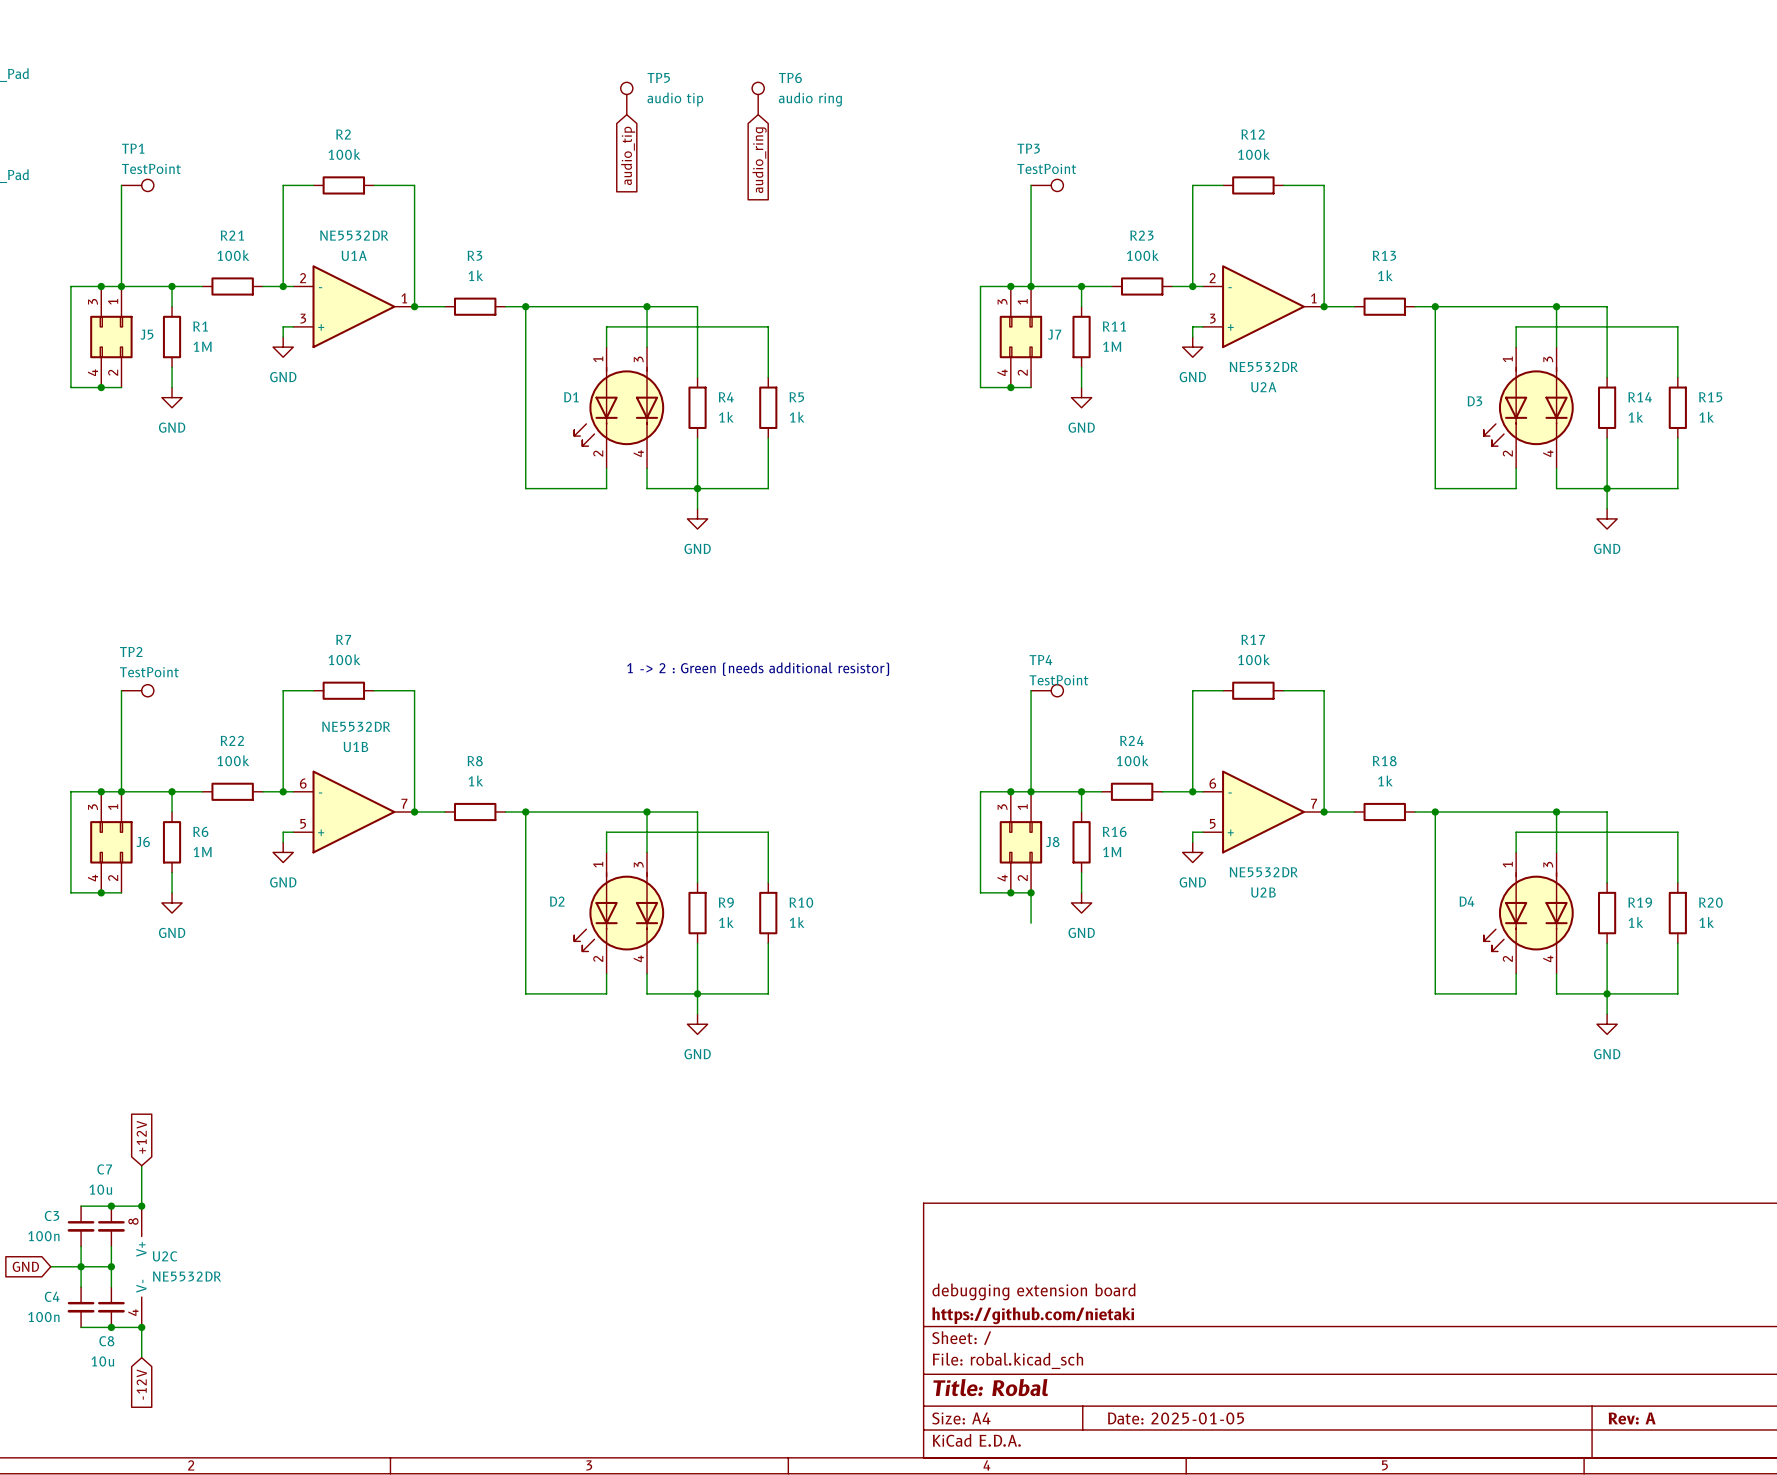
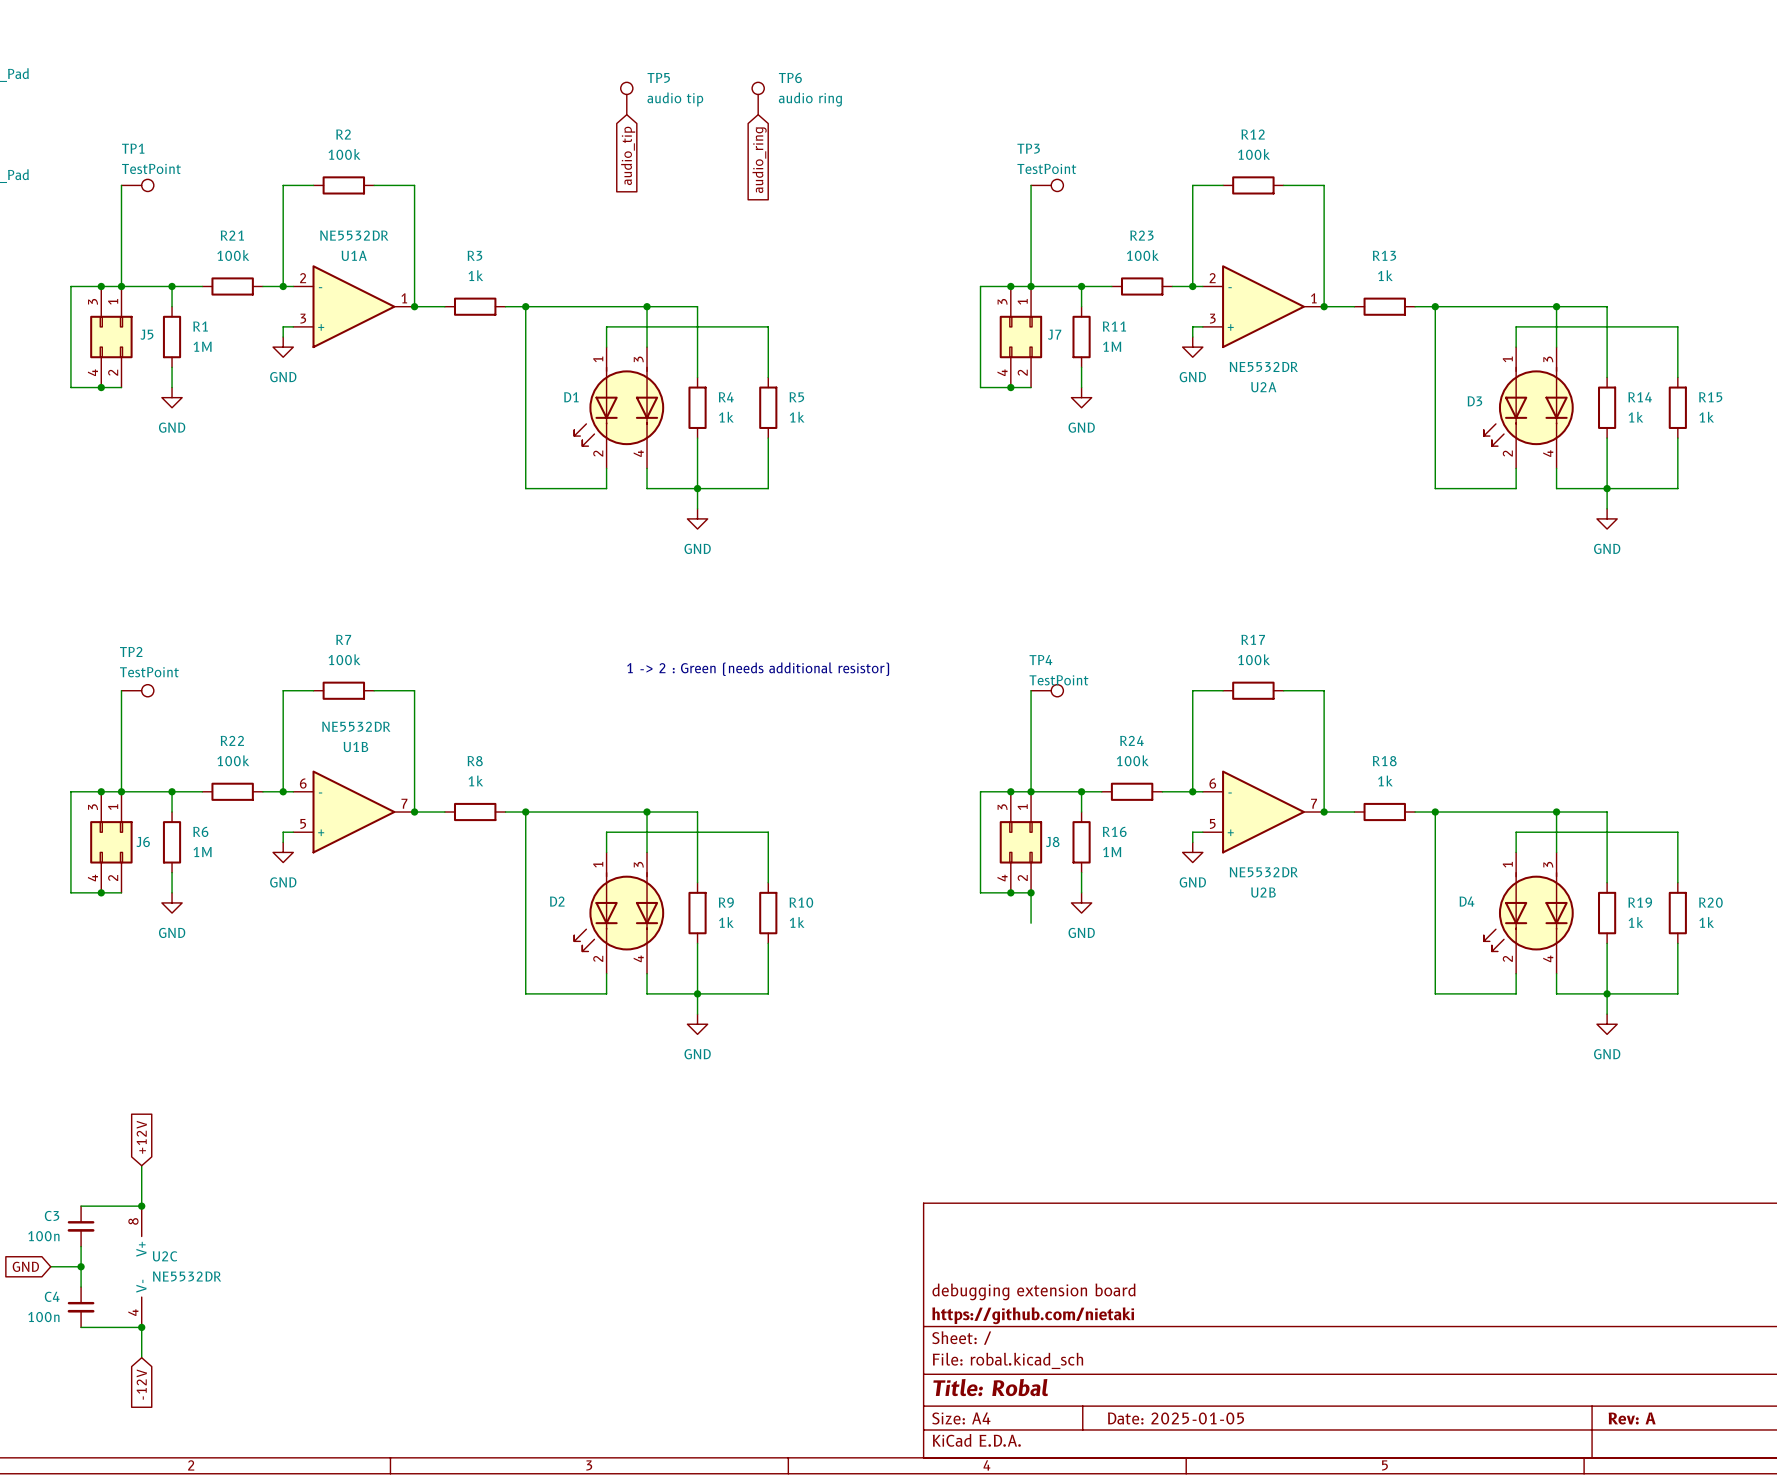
junction: (111, 1206) -> none
C7: 10u (111, 1226) -> none
wire: (111, 1246) (111, 1286) -> none
wire: (81, 1266) (111, 1266) -> none
junction: (111, 1266) -> none
C8: 10u (111, 1307) -> none
junction: (111, 1327) -> none

